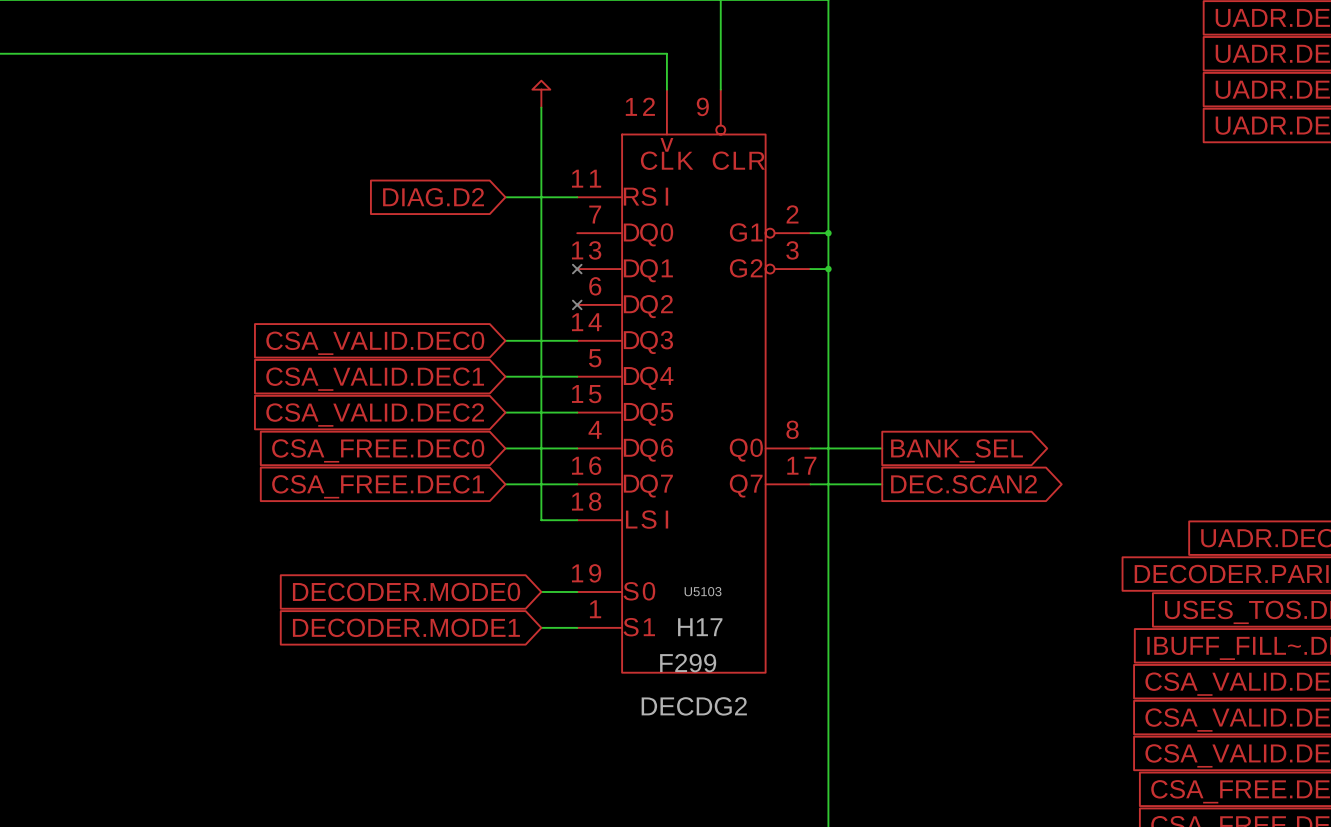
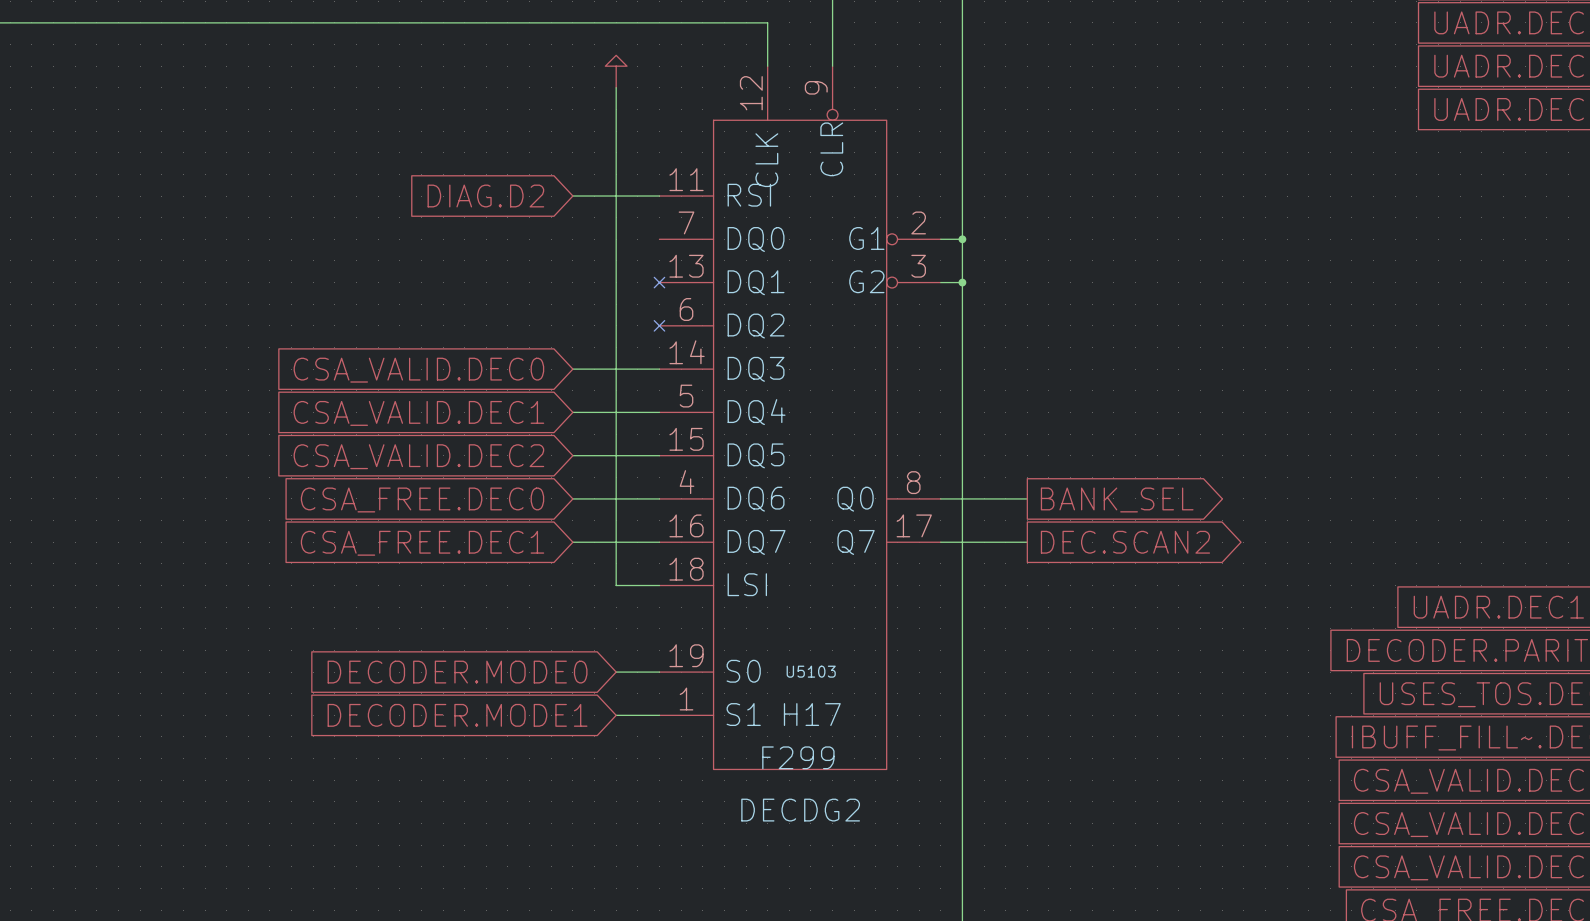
U5103 symbol: [577, 89, 811, 673] -> [659, 66, 941, 770]

